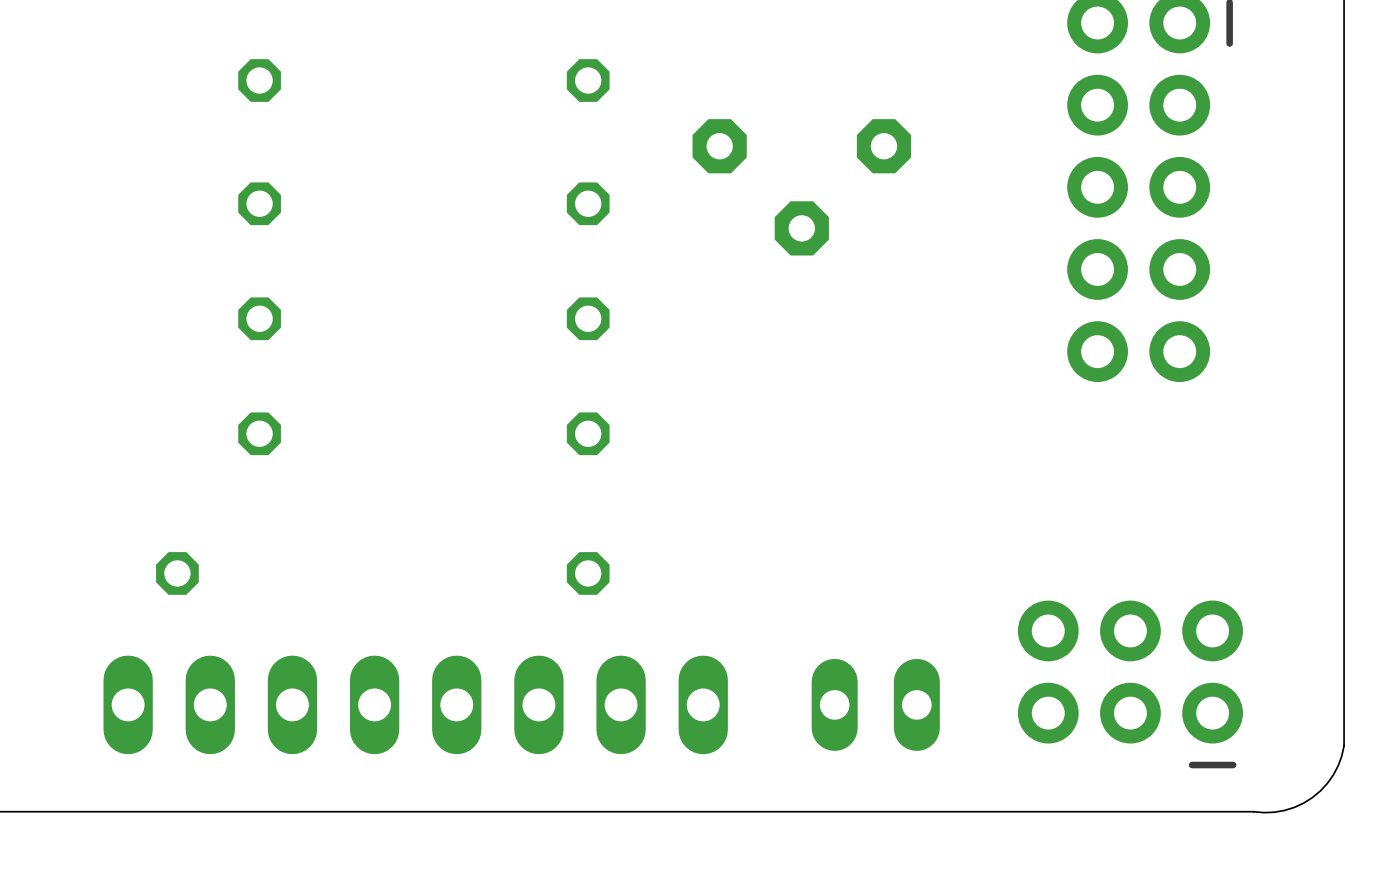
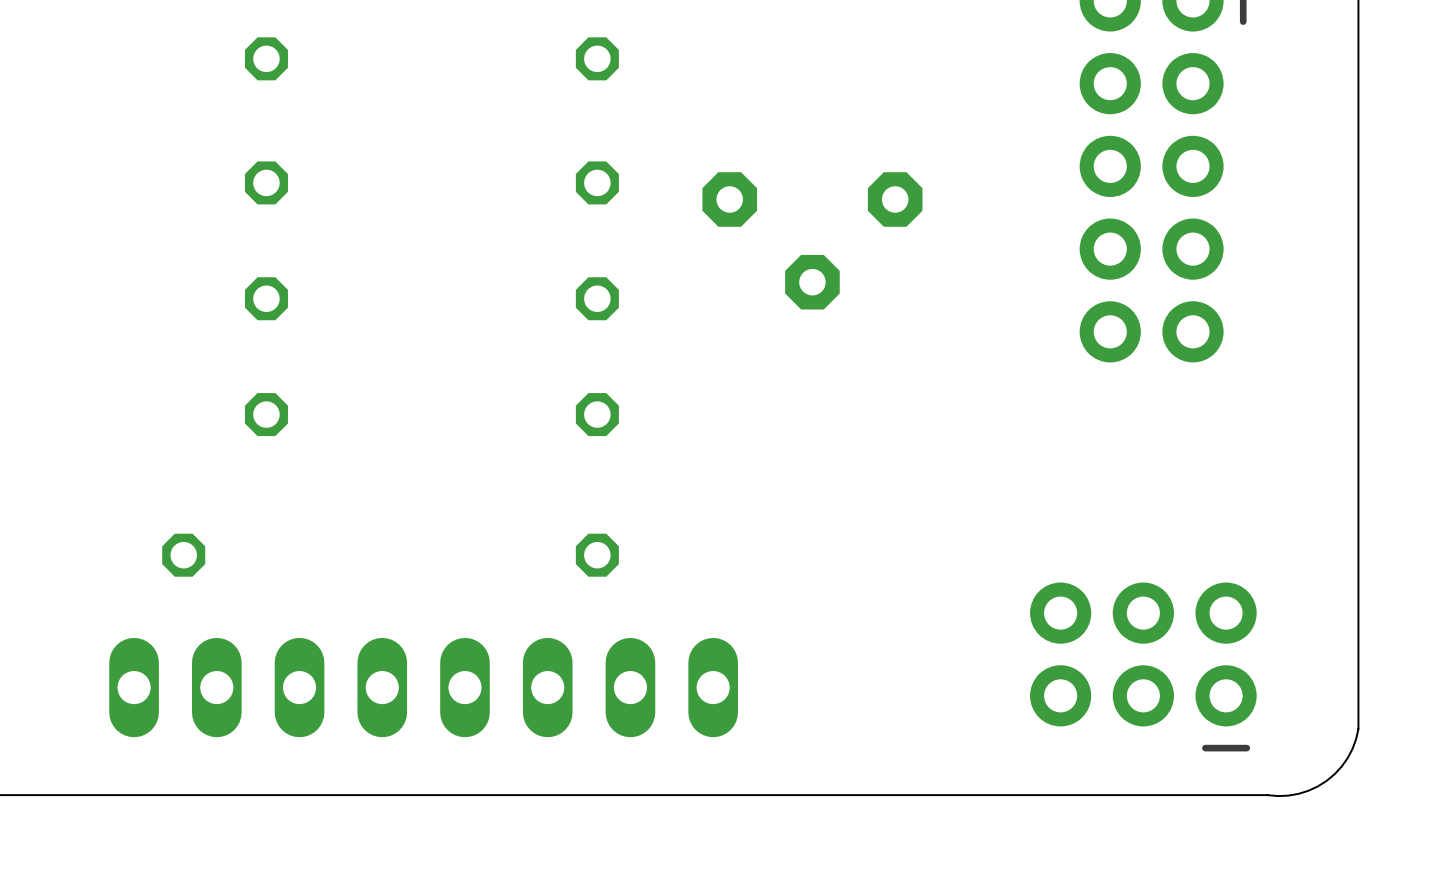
part position: (801, 187) -> (812, 240)
part: (875, 704) -> none

